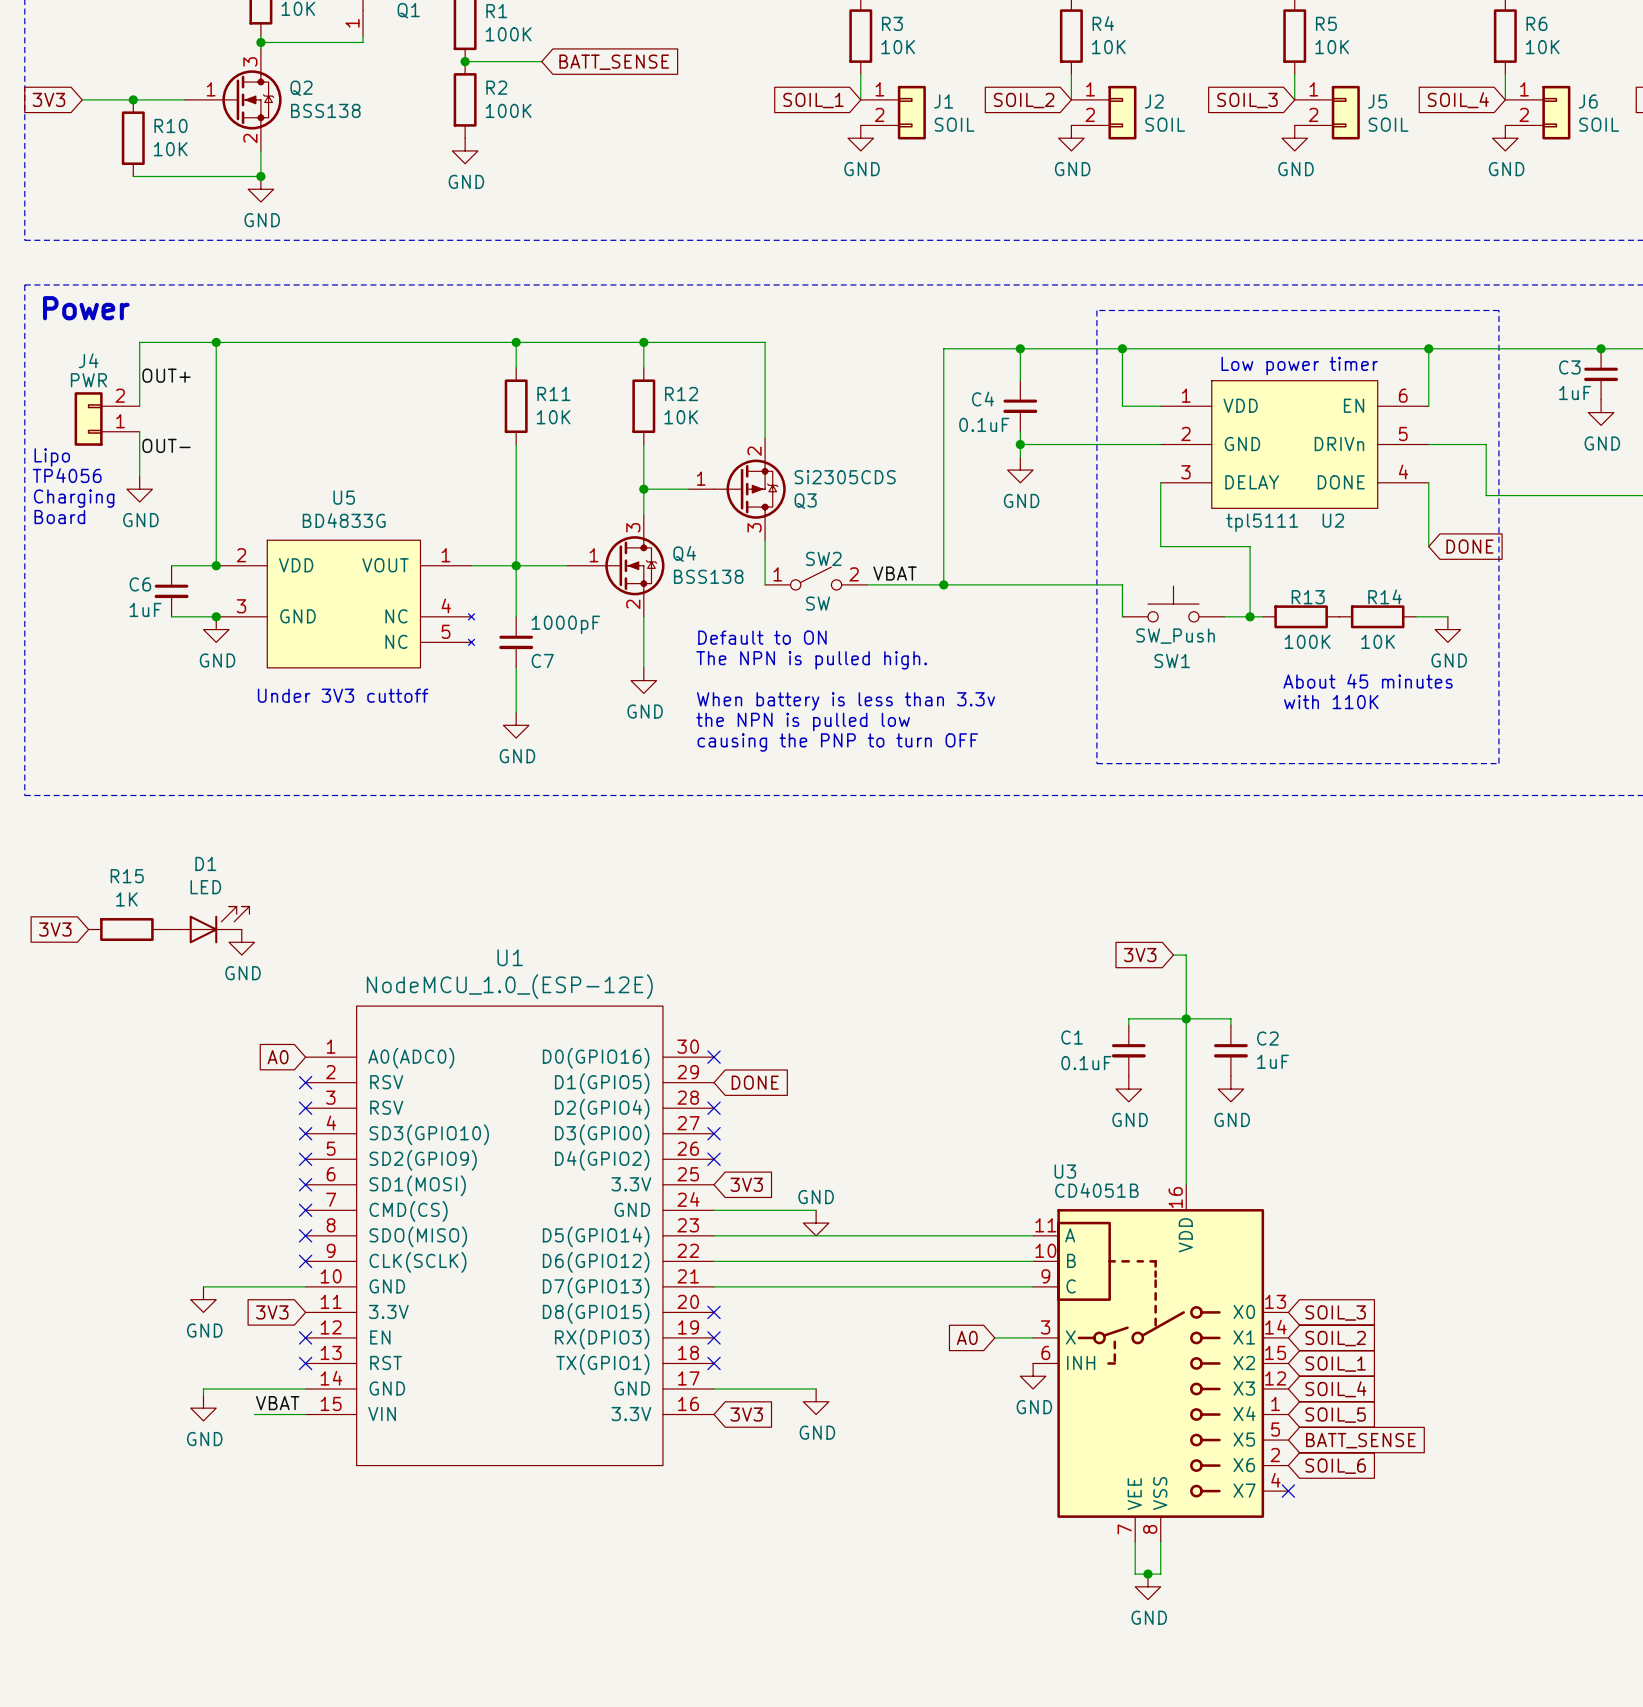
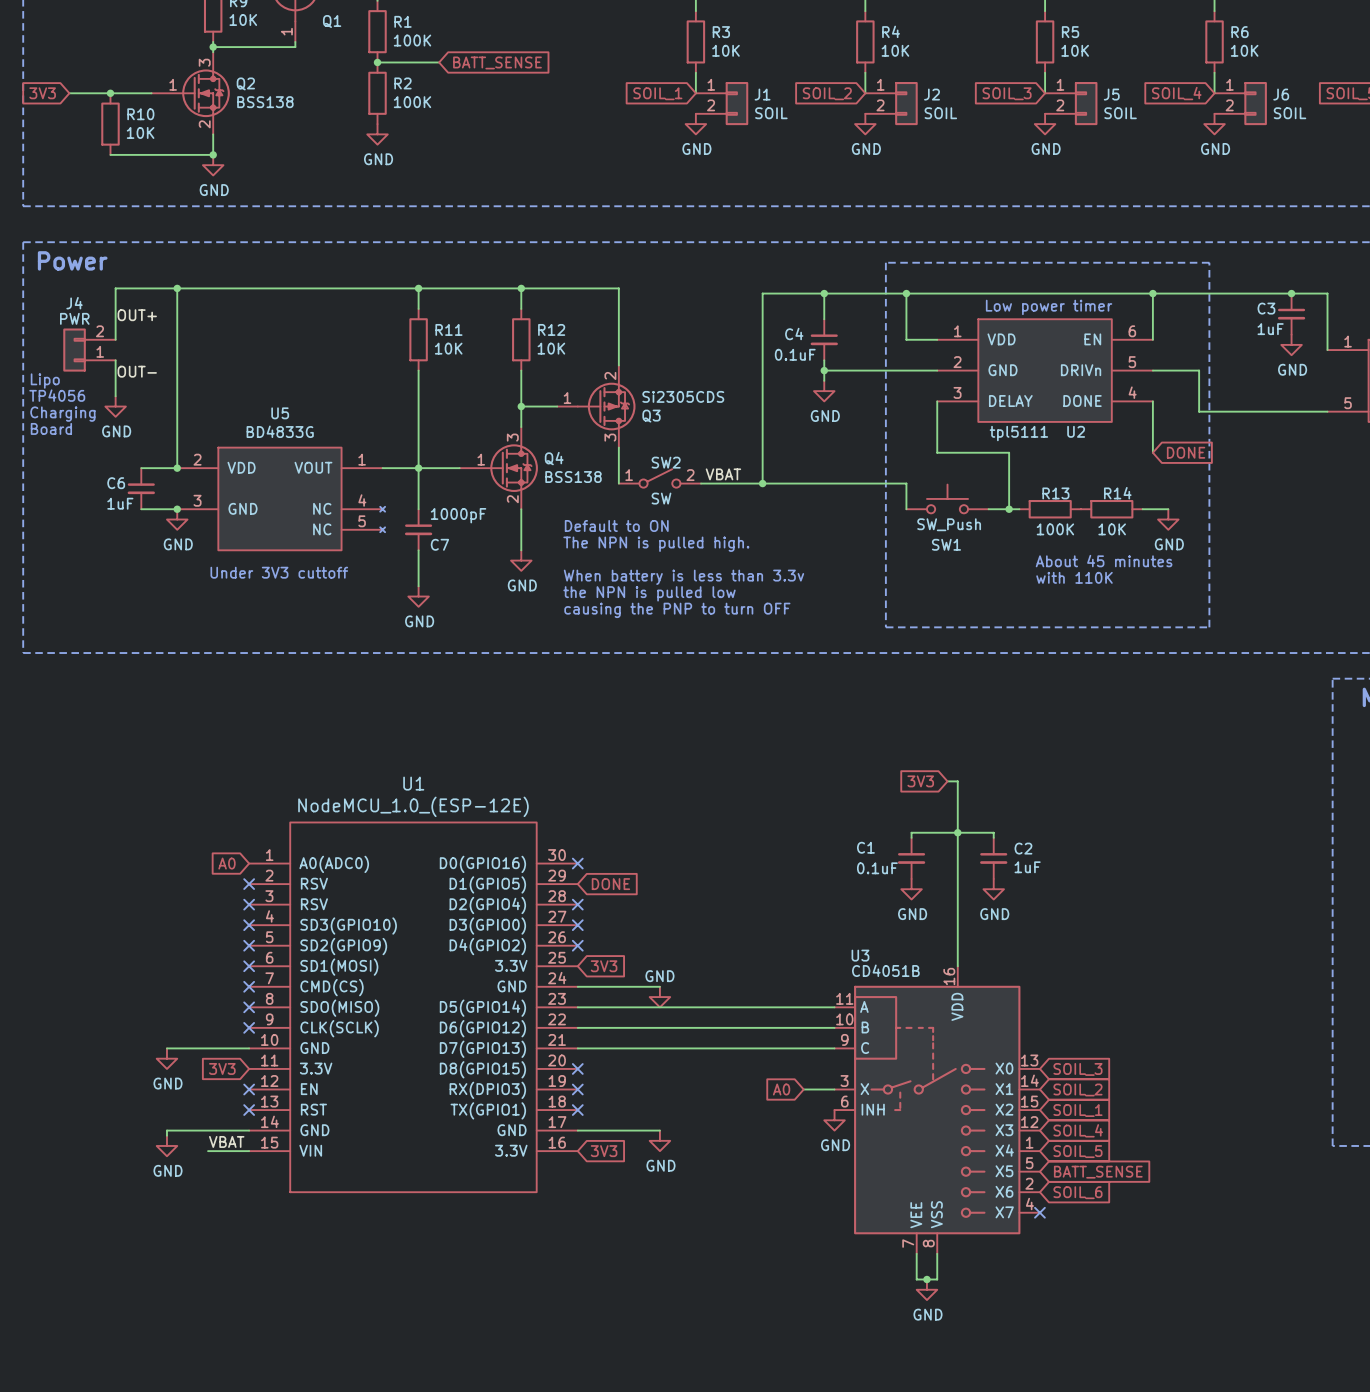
D1: LED (207, 924) -> none
global label: 3V3 (55, 929) -> none
R15: 1K (126, 929) -> none
power symbol: GND (241, 942) -> none

